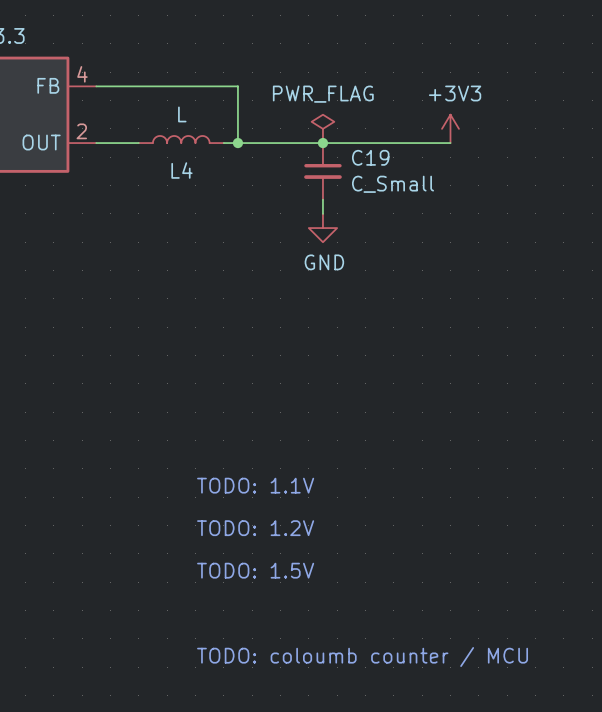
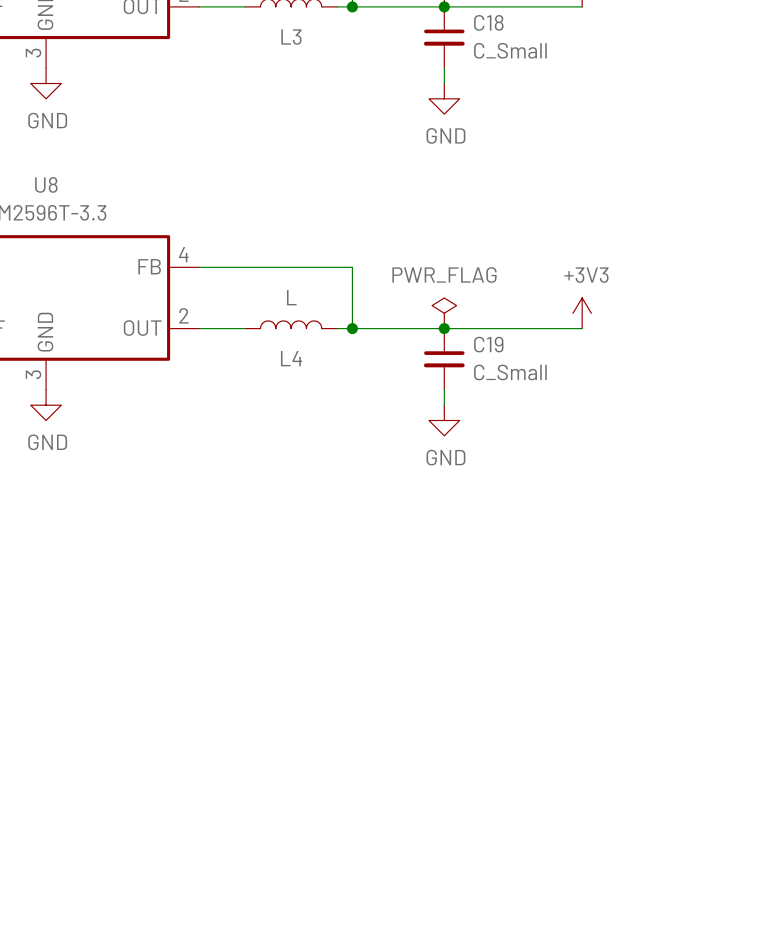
text: TODO: 1.1V (255, 485) -> none
text: TODO: 1.2V (255, 528) -> none
text: TODO: 1.5V (255, 570) -> none
text: TODO: coloumb counter / MCU (362, 657) -> none

